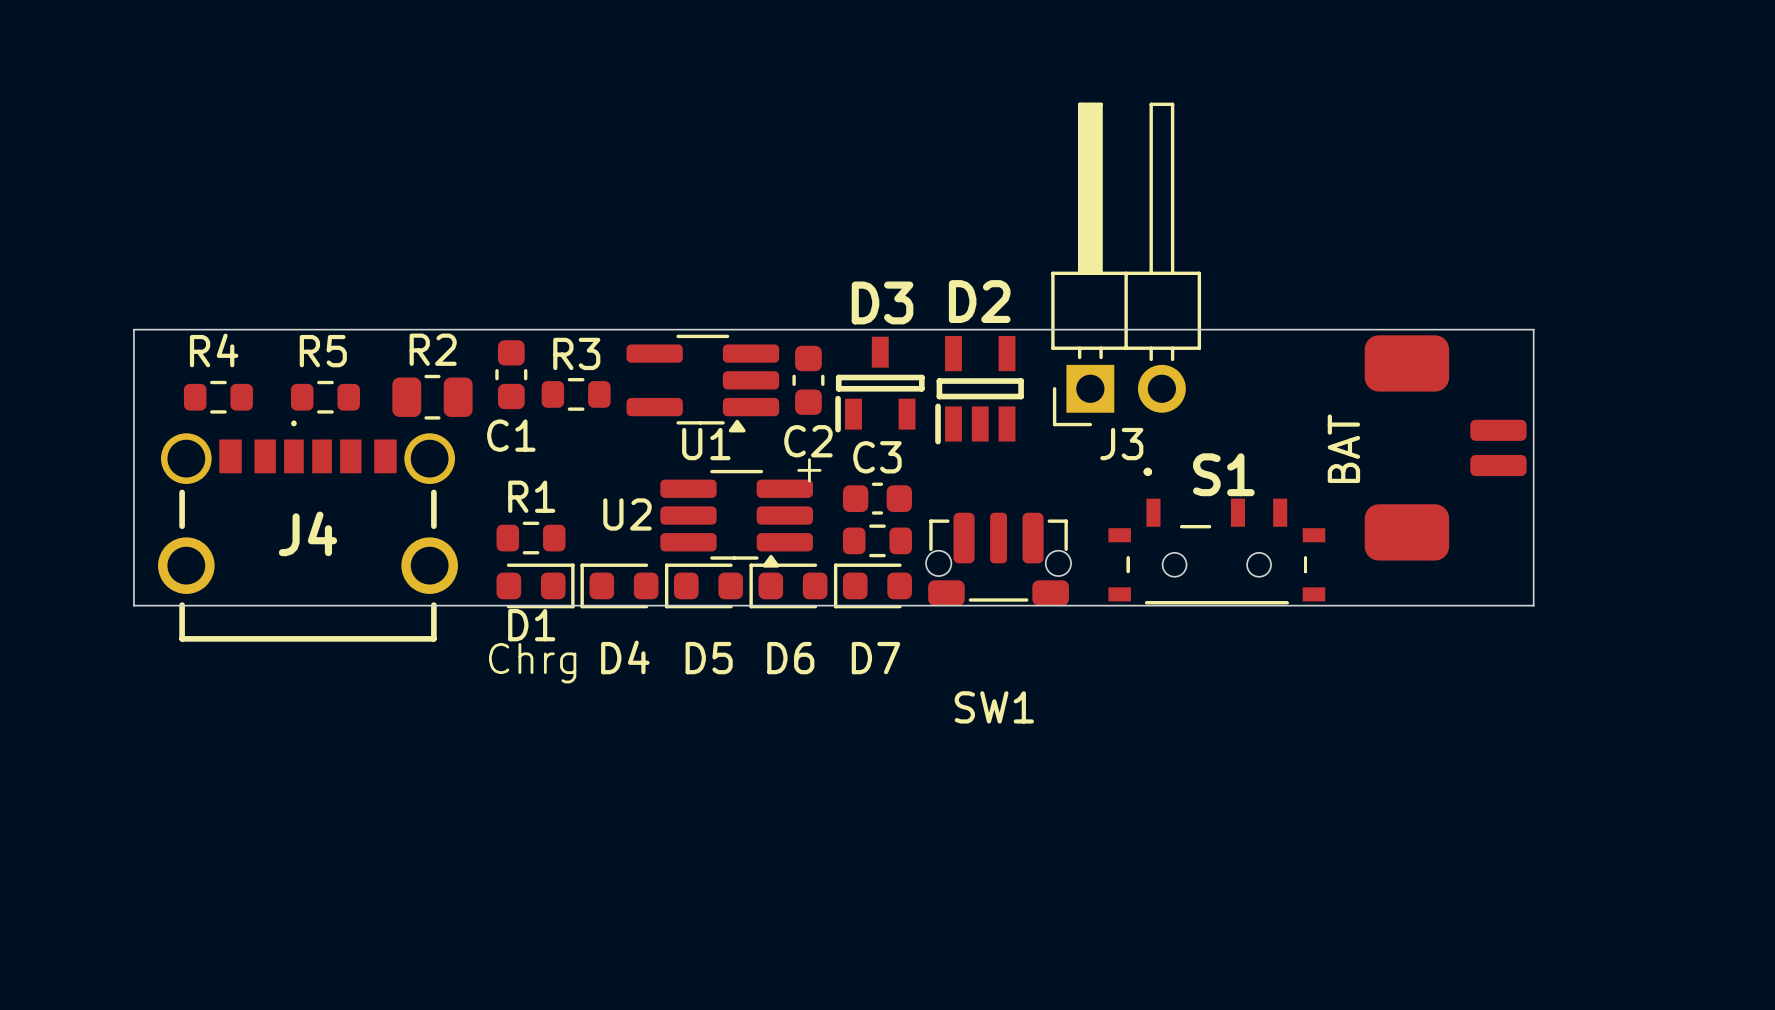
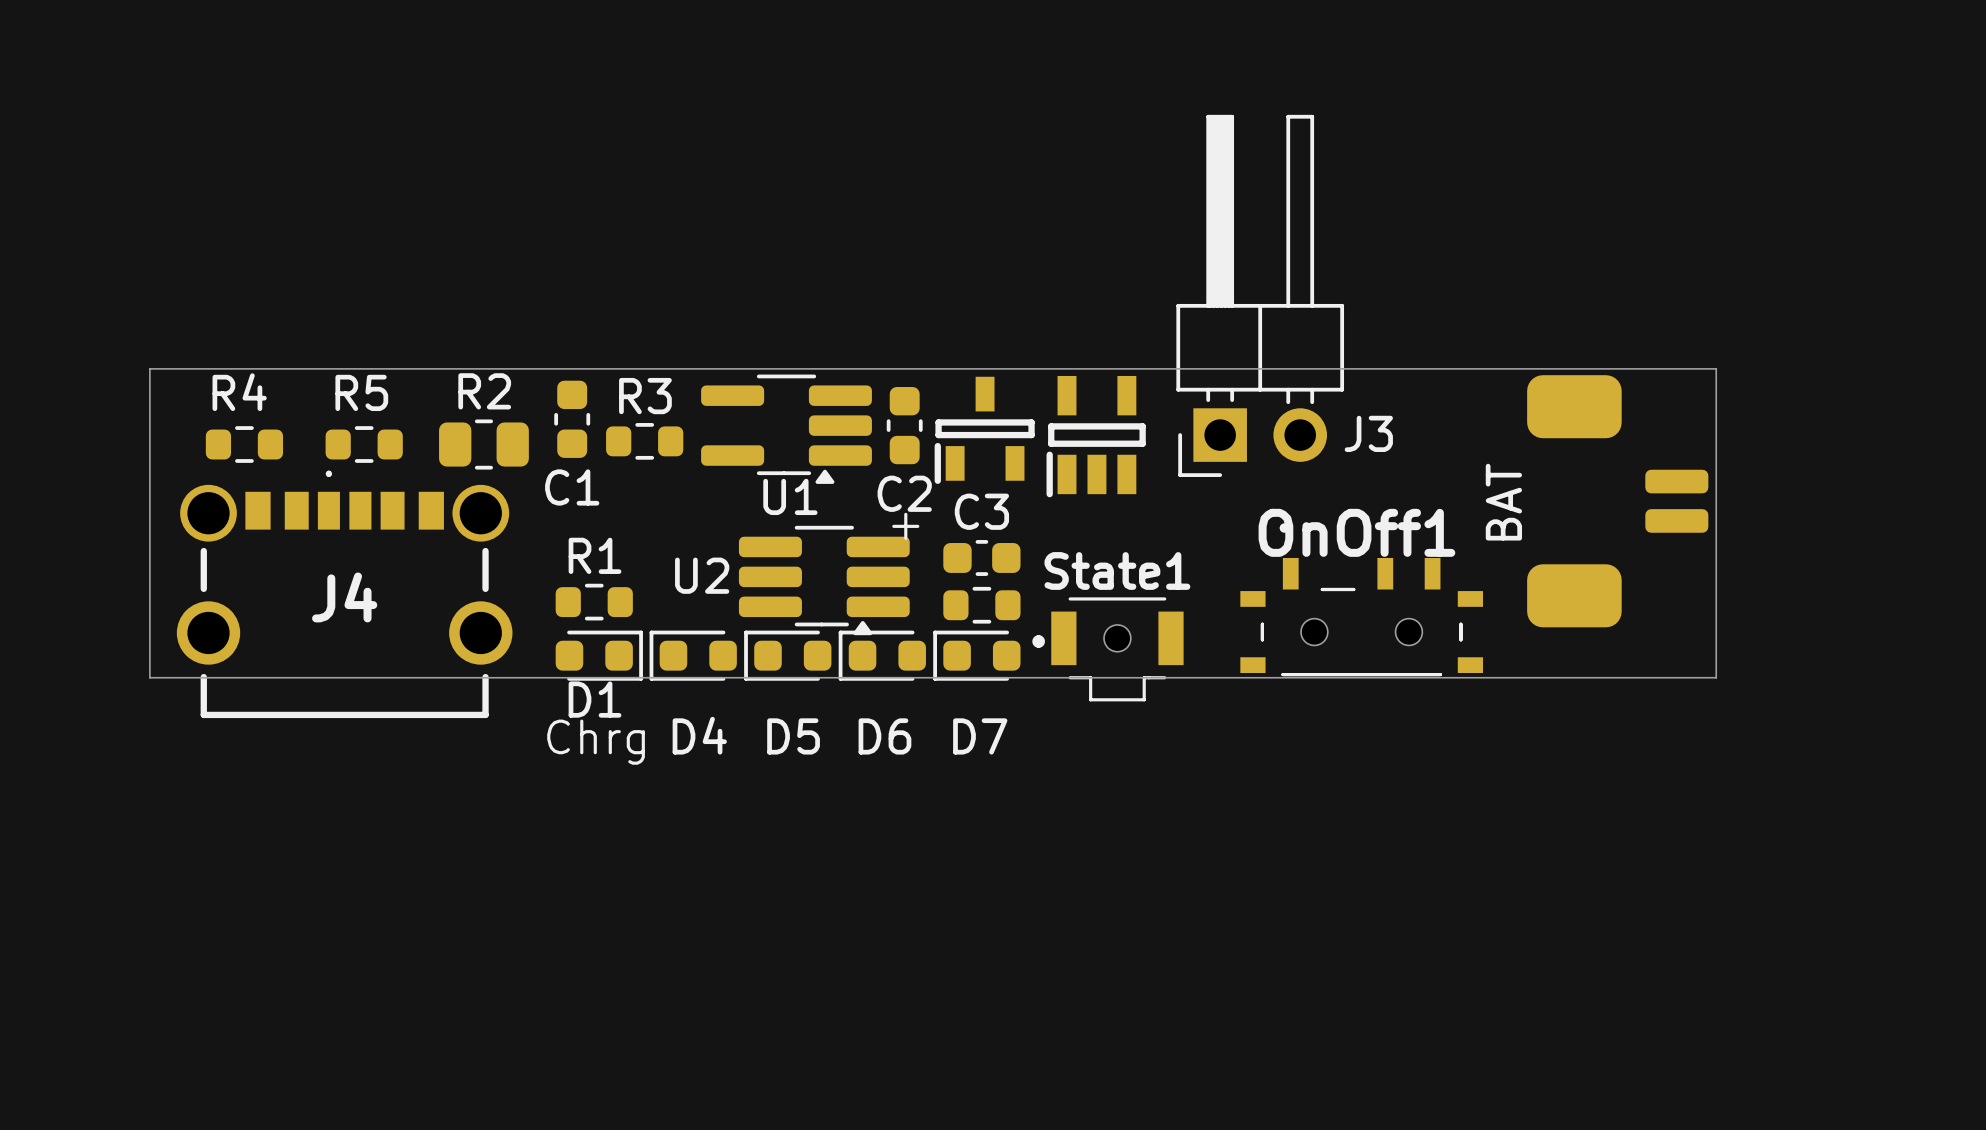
D2 name: D2 (979, 301) -> none
D3 name: D3 (882, 302) -> none
J3 name position: J3 (1121, 444) -> J3 (1368, 433)
S1 name: S1 (1223, 474) -> OnOff1 (1356, 532)
SW1: (998, 559) -> none
State1: none -> (1107, 649)

